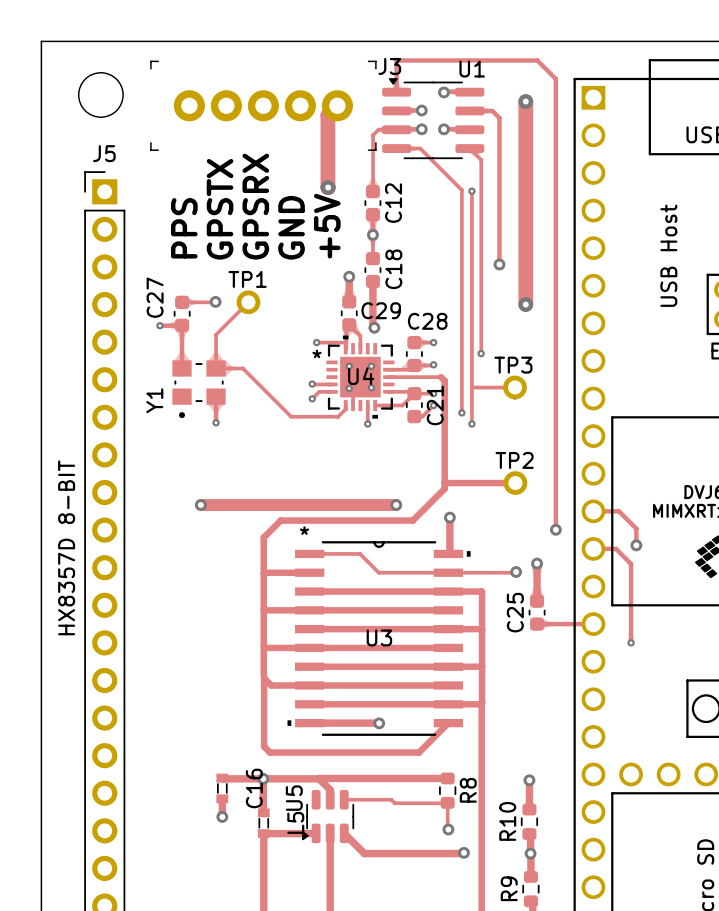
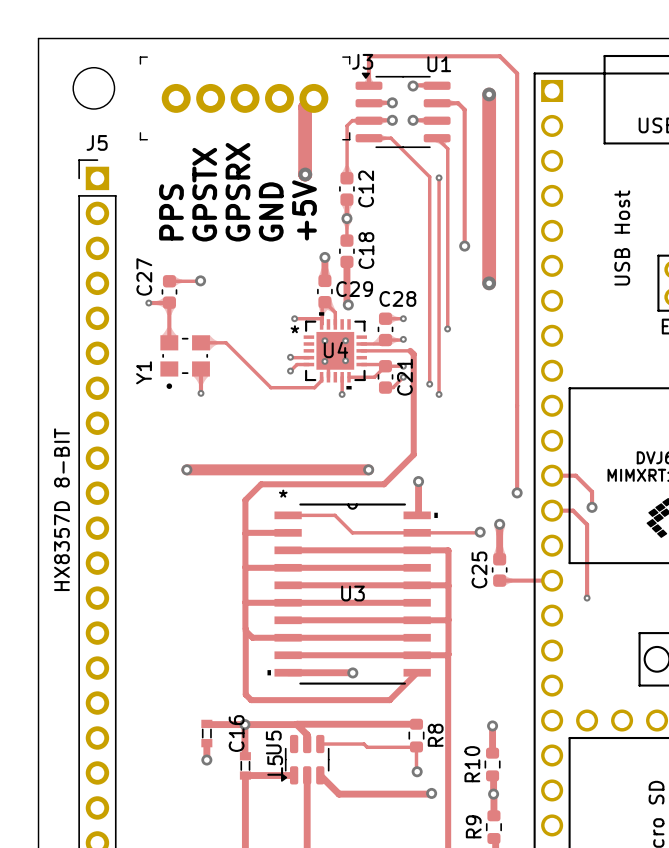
track: (248, 302) (216, 334) (216, 368) -> none
TP1: (248, 302) -> none
track: (471, 387) (504, 387) (515, 398) -> none
TP3: (515, 387) -> none
track: (444, 483) (515, 483) -> none
TP2: (515, 483) -> none

